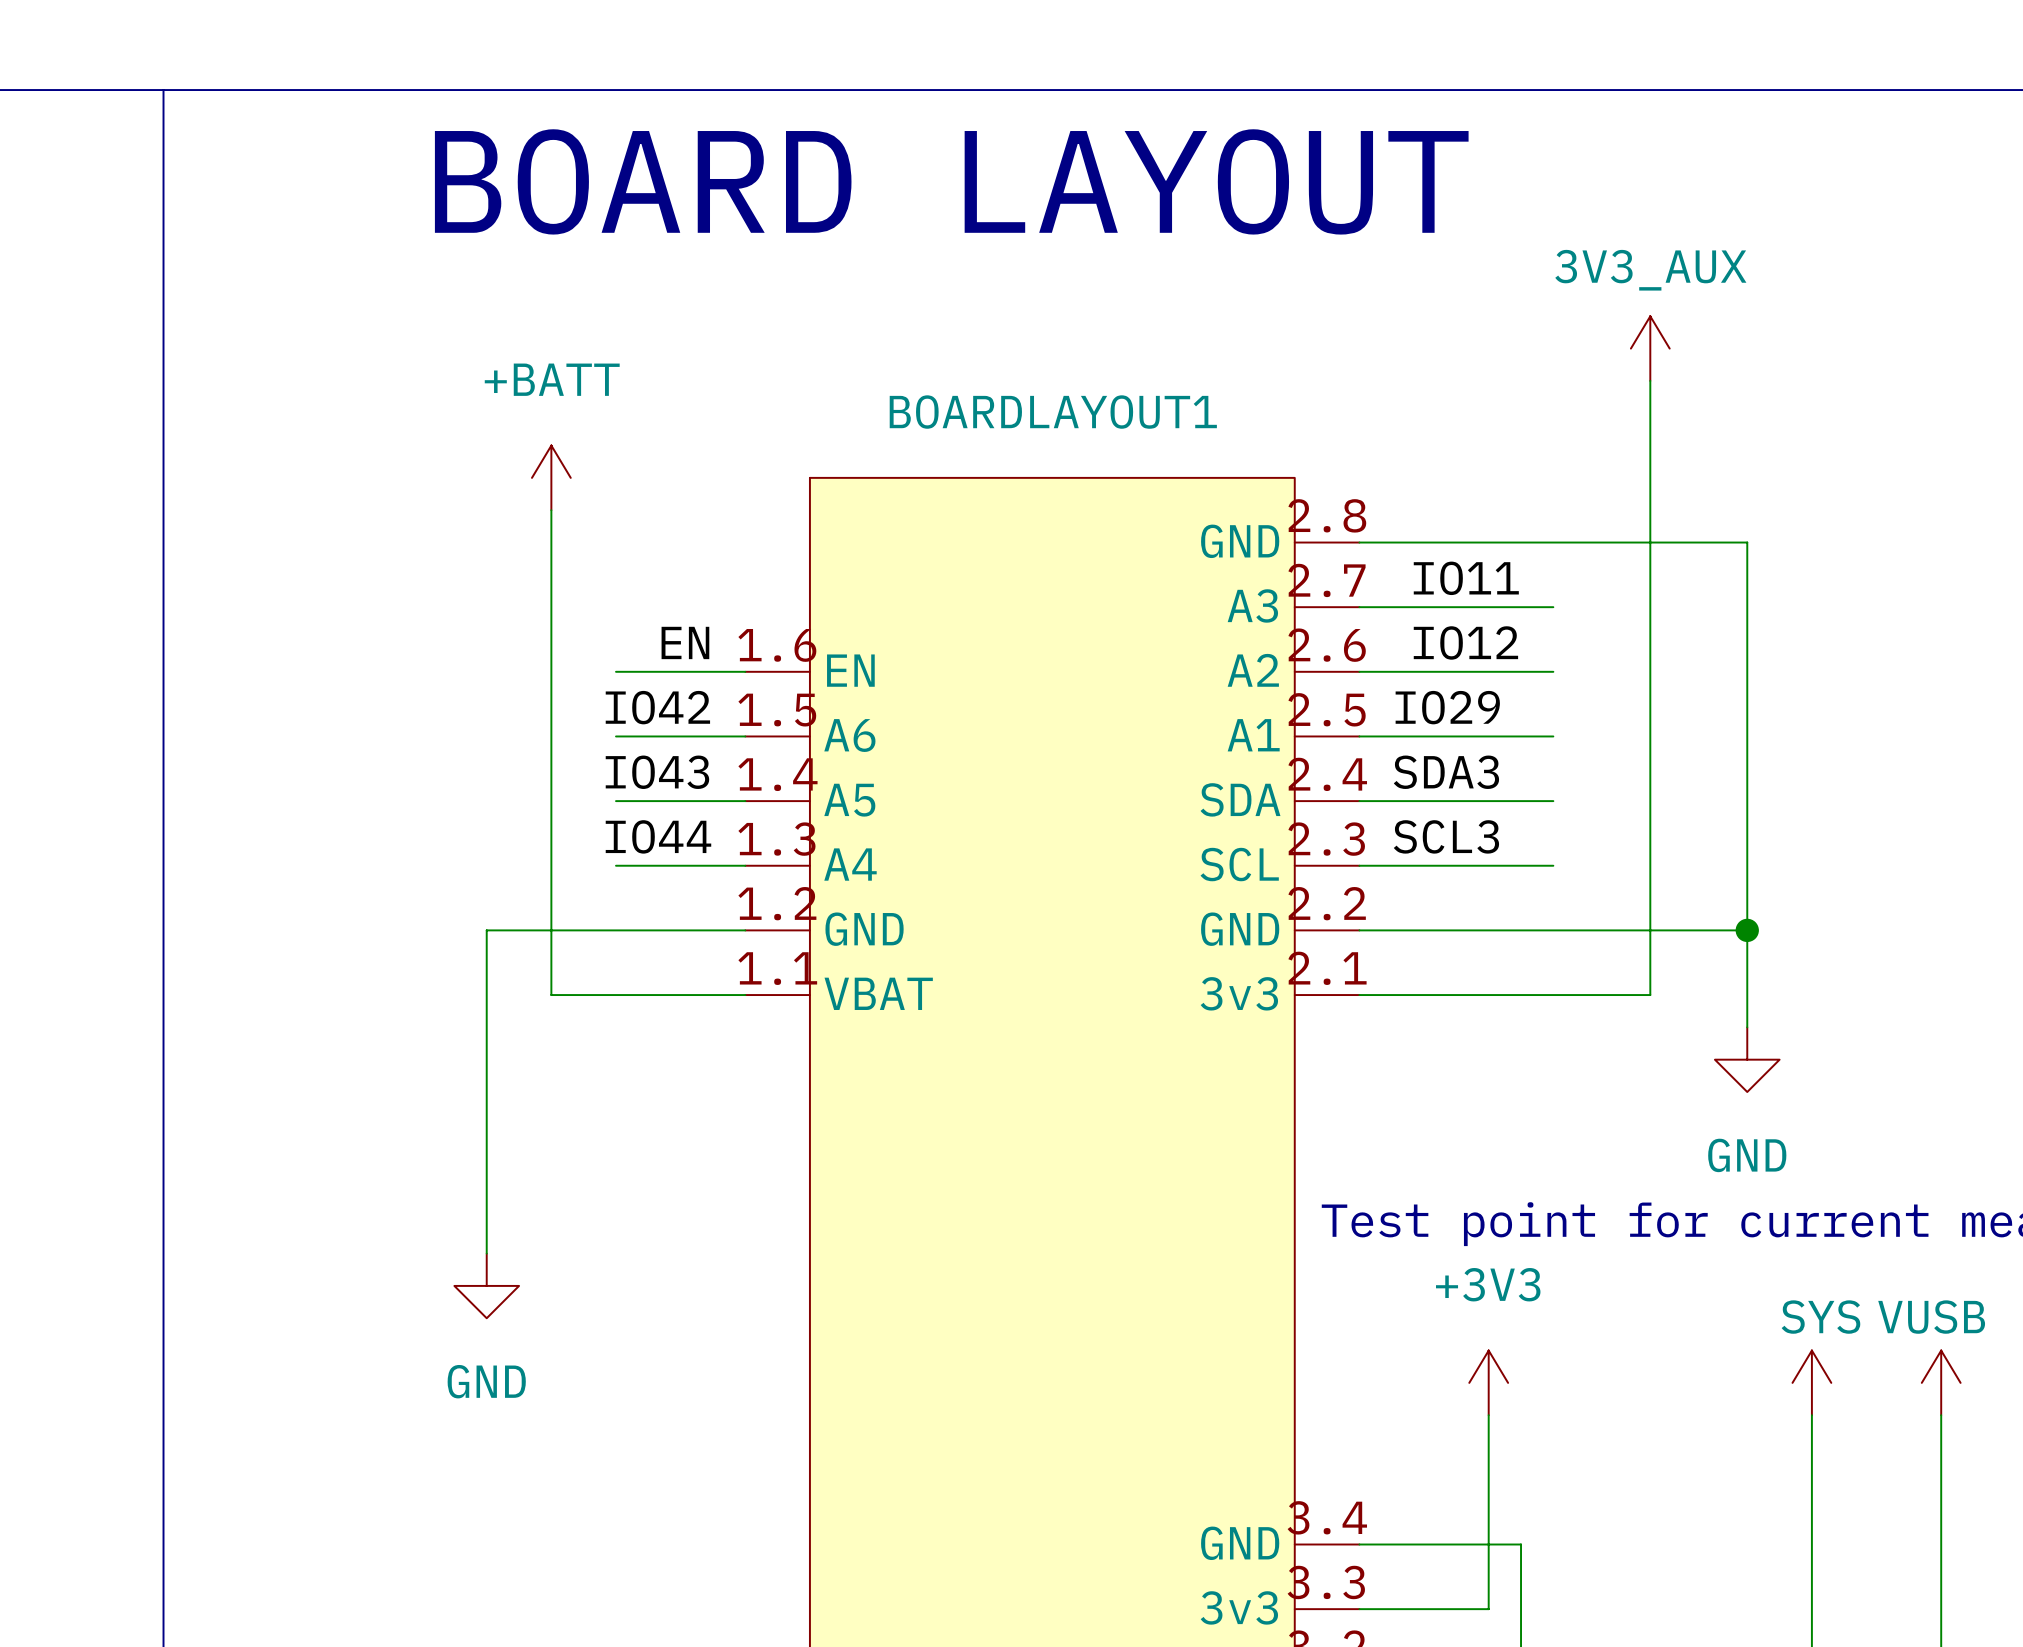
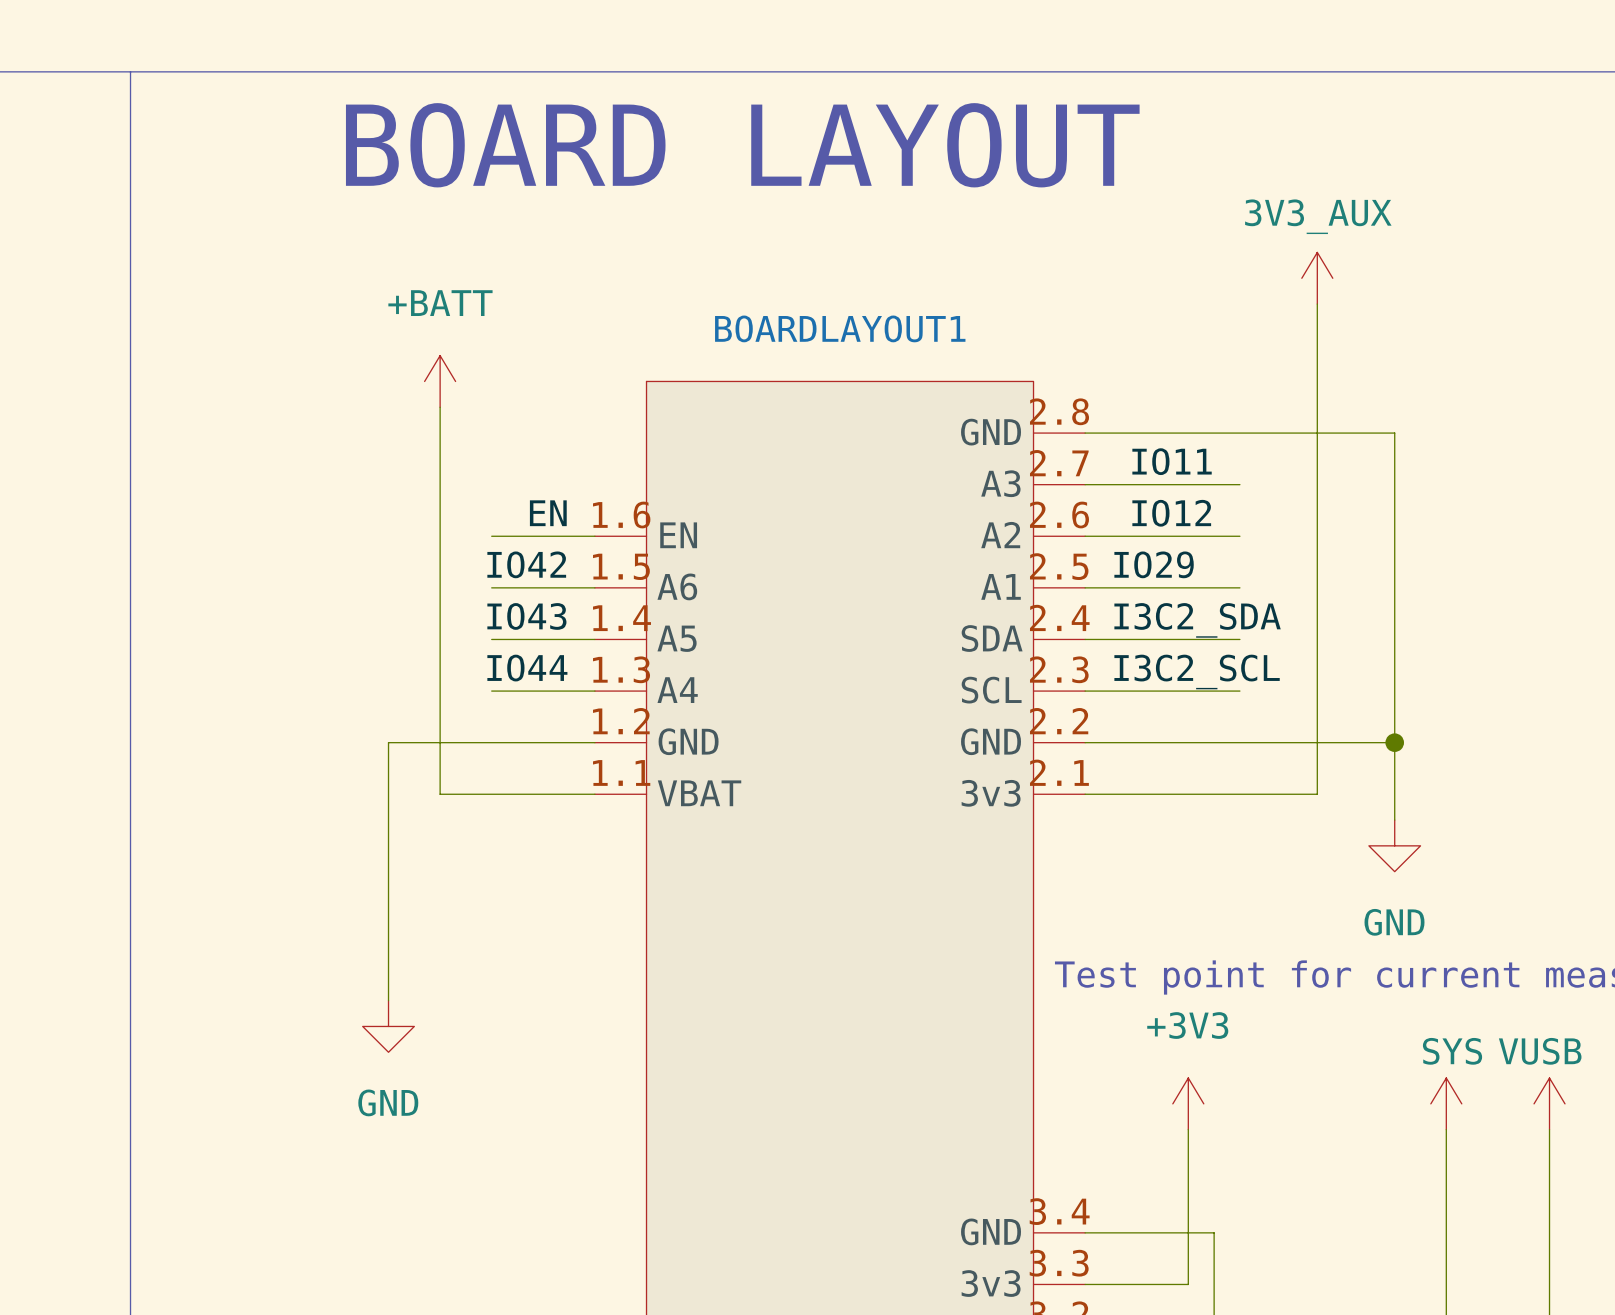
label: SDA3 (1446, 772) -> I3C2_SDA (1197, 620)
label: SCL3 (1446, 836) -> I3C2_SCL (1197, 671)

